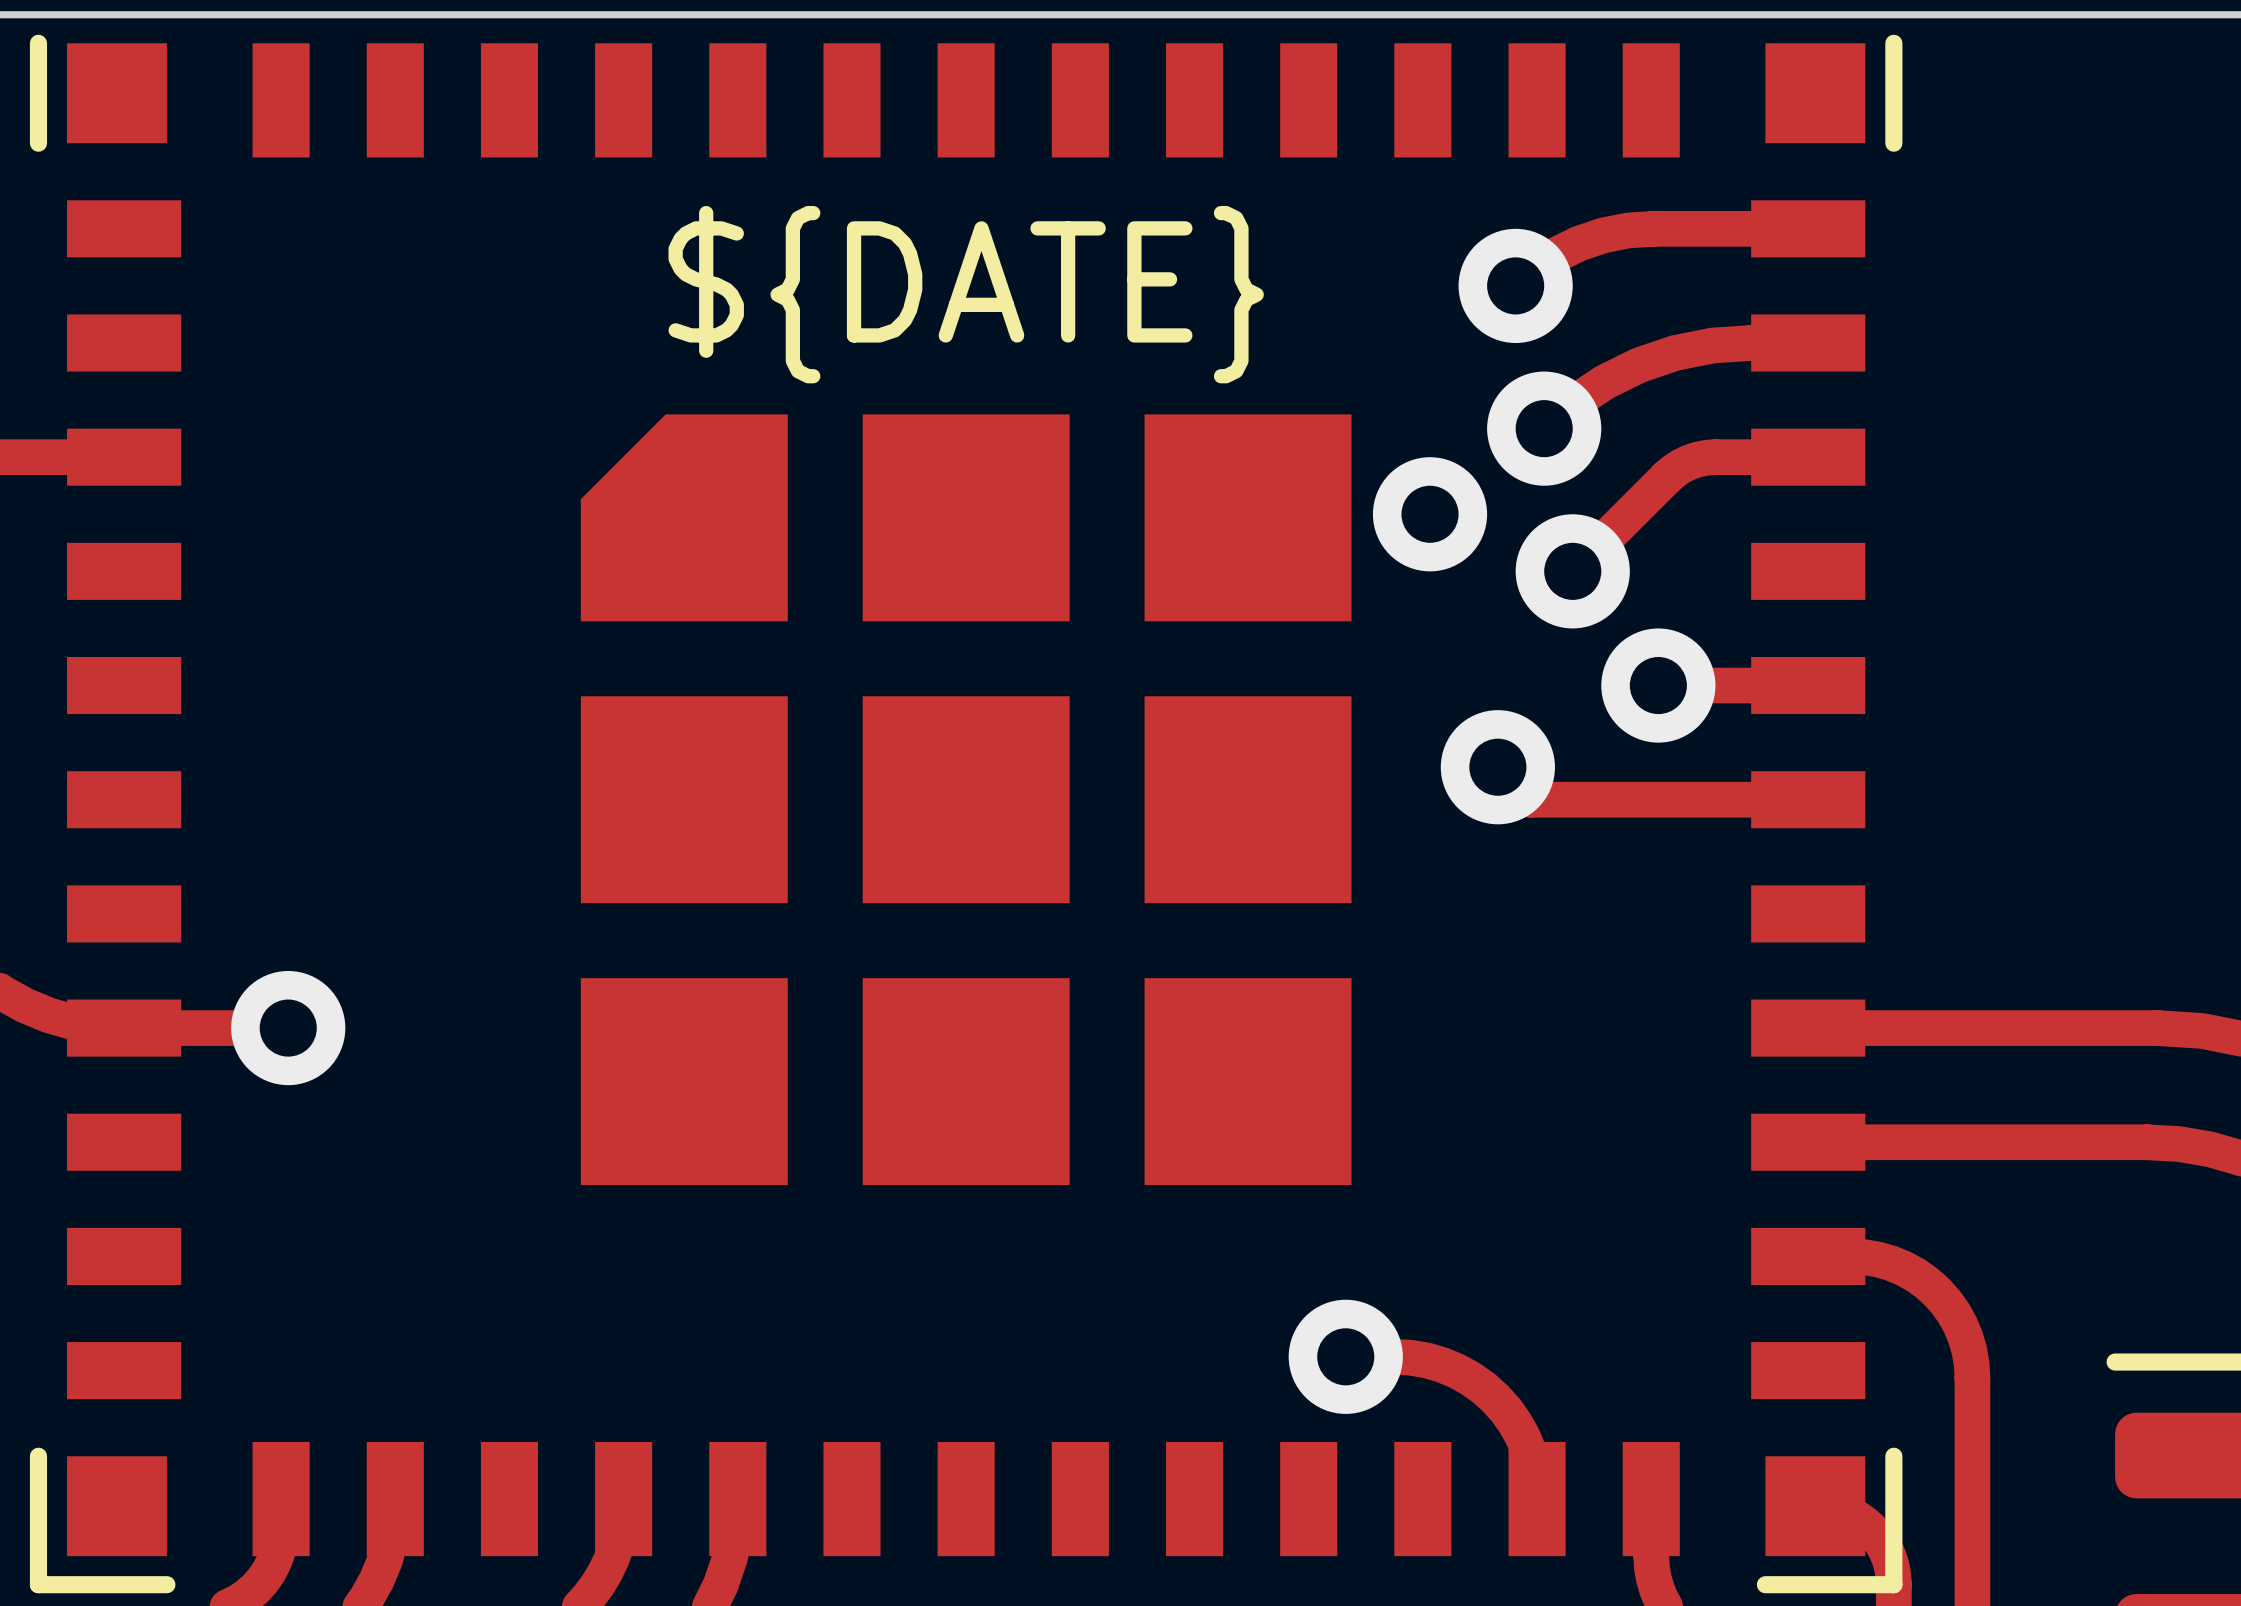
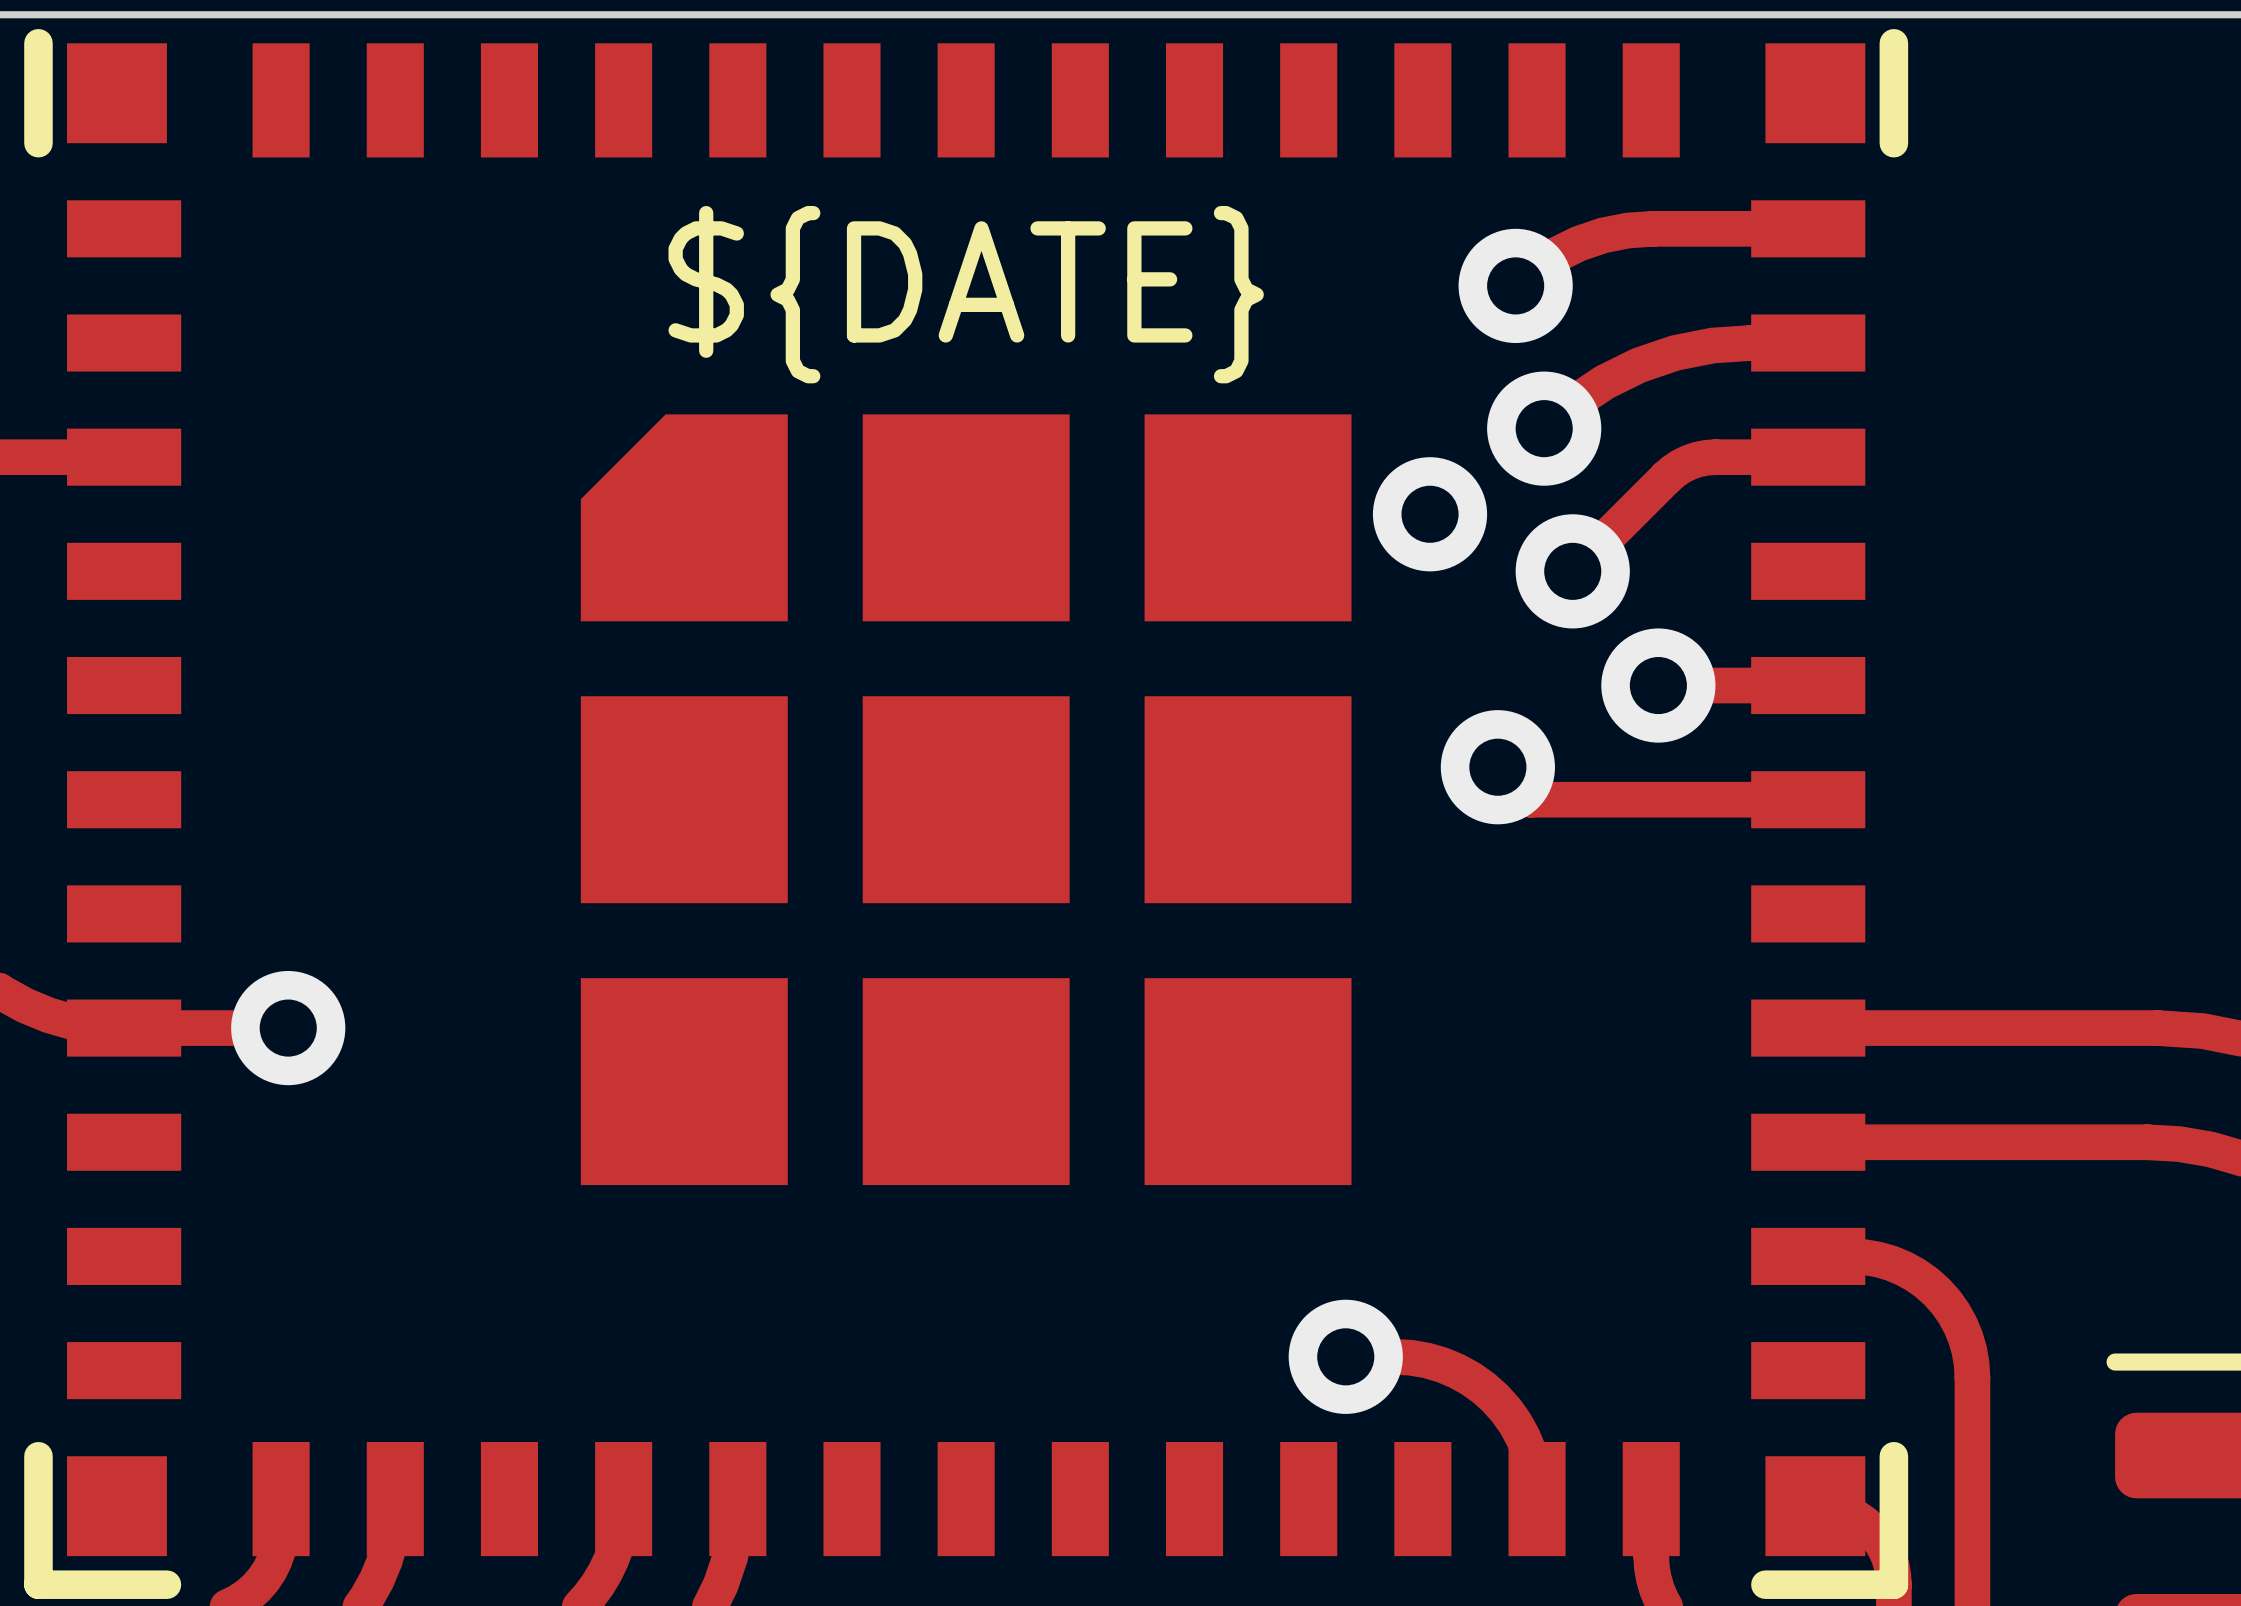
part footprint: [29, 34, 1903, 1594] -> [24, 29, 1909, 1599]

